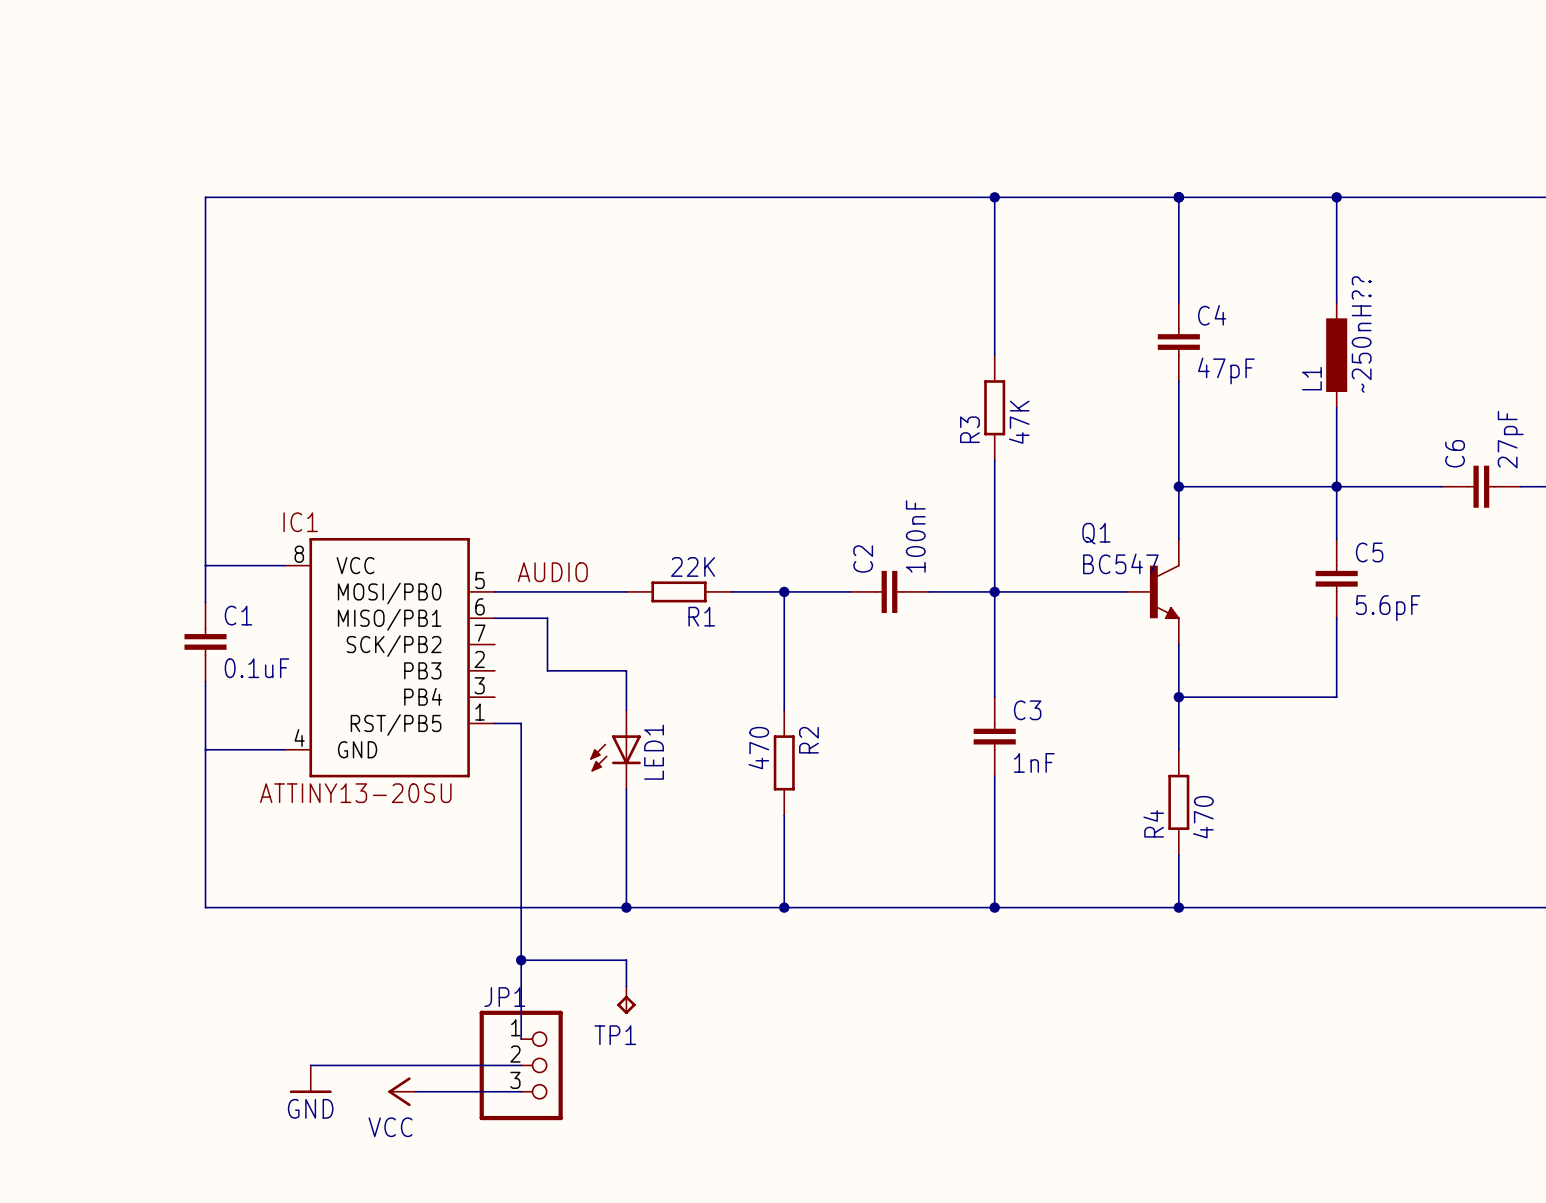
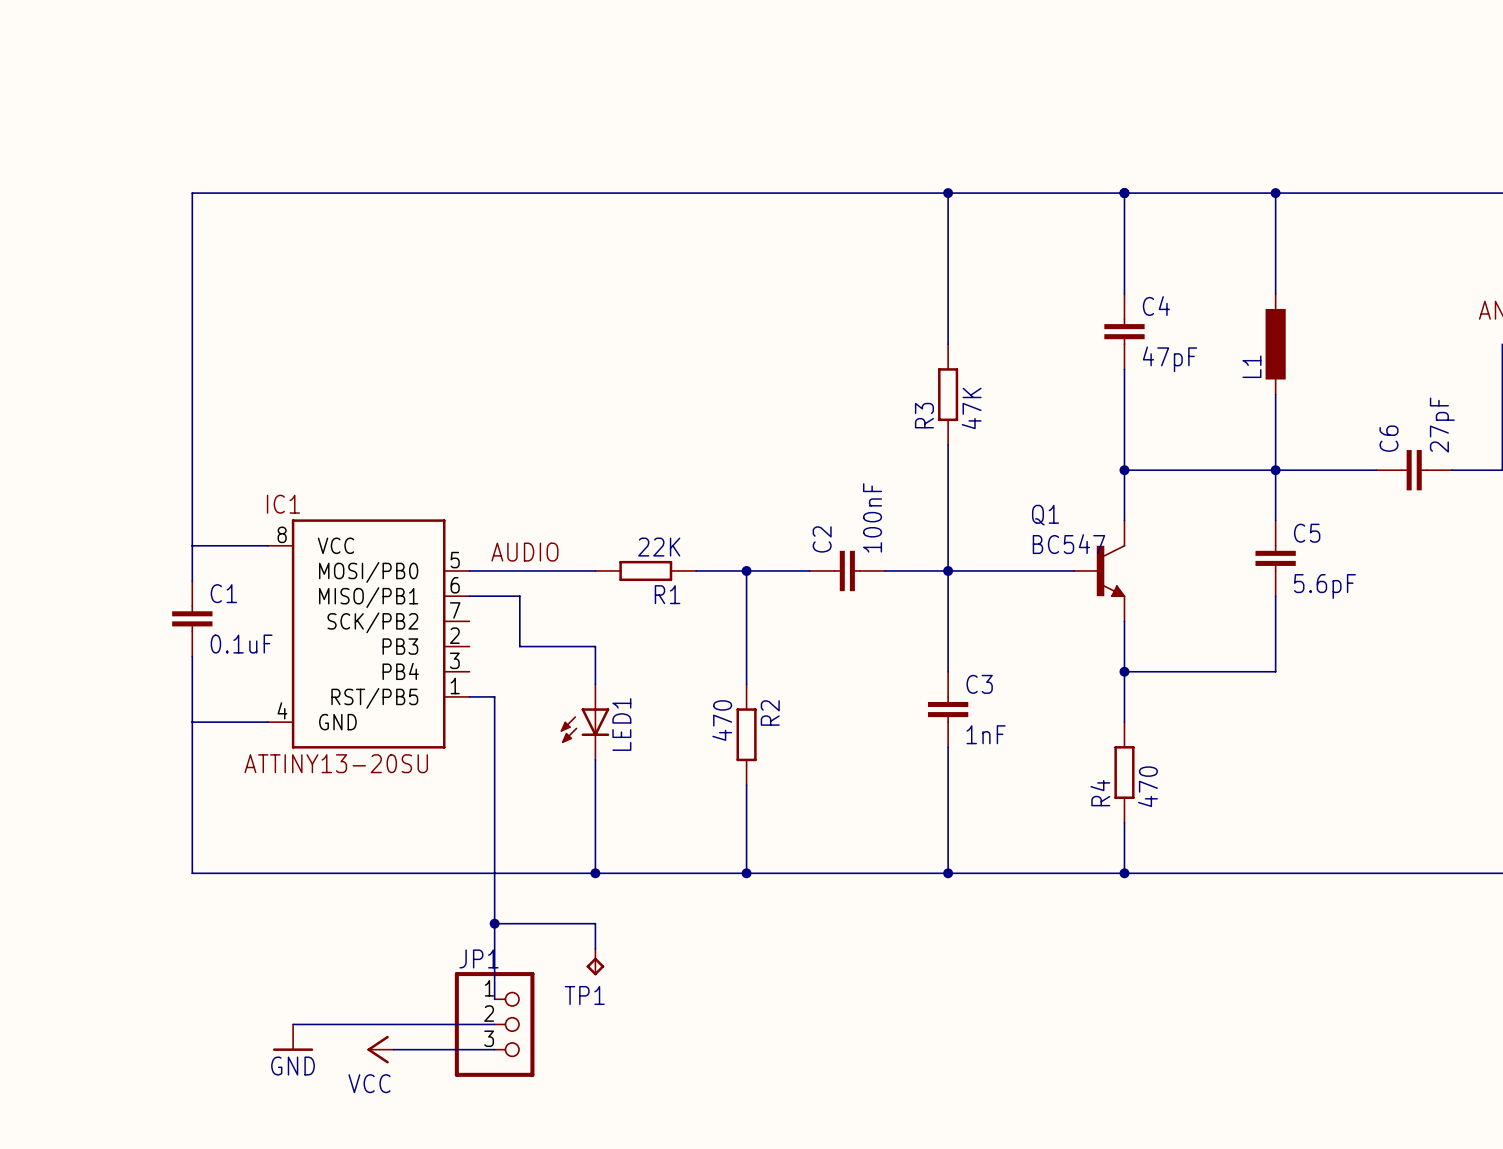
L1 value: ~250nH?? (1361, 334) -> none

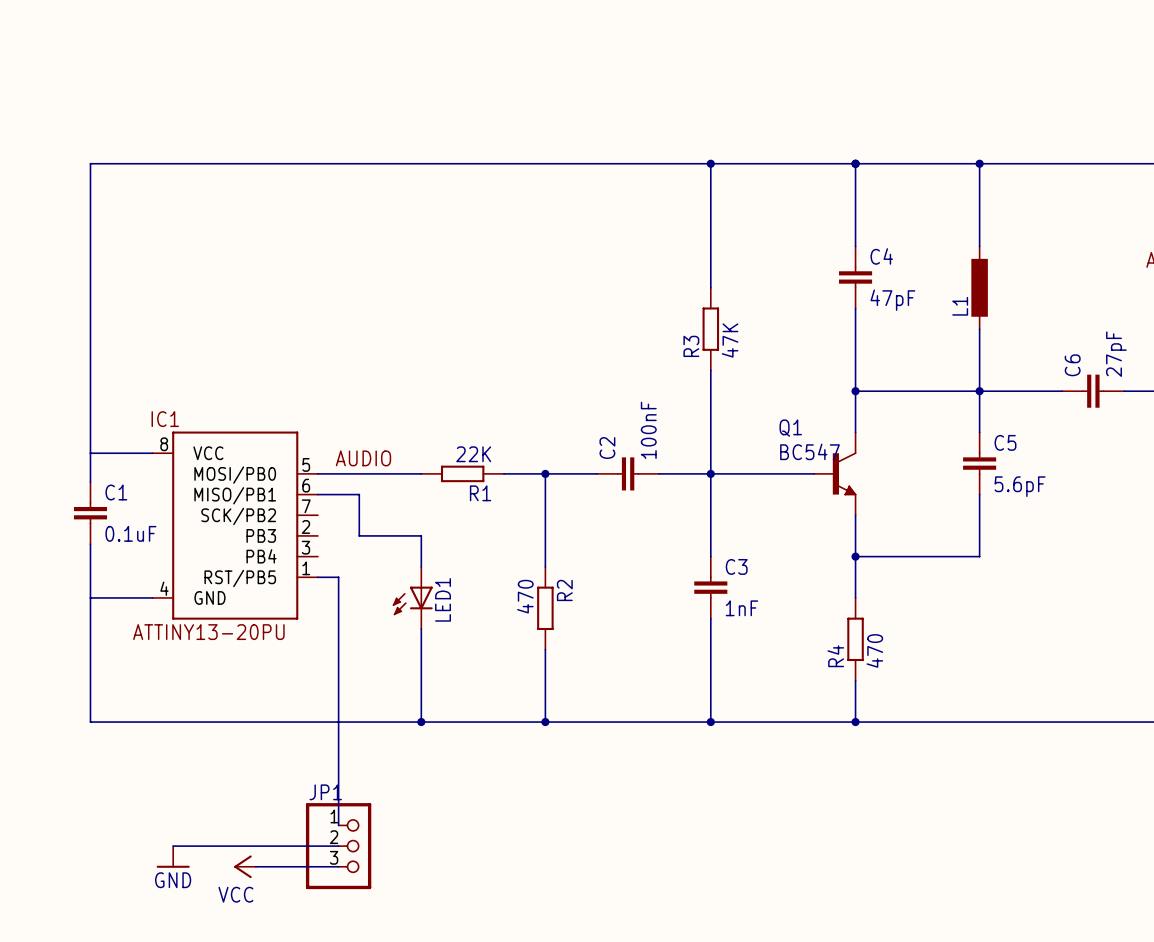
IC1 value: ATTINY13-20SU (336, 763) -> ATTINY13-20PU (208, 632)
wire: (494, 923) (595, 923) (595, 948) -> none
junction: (494, 923) -> none
TP1: (595, 962) -> none

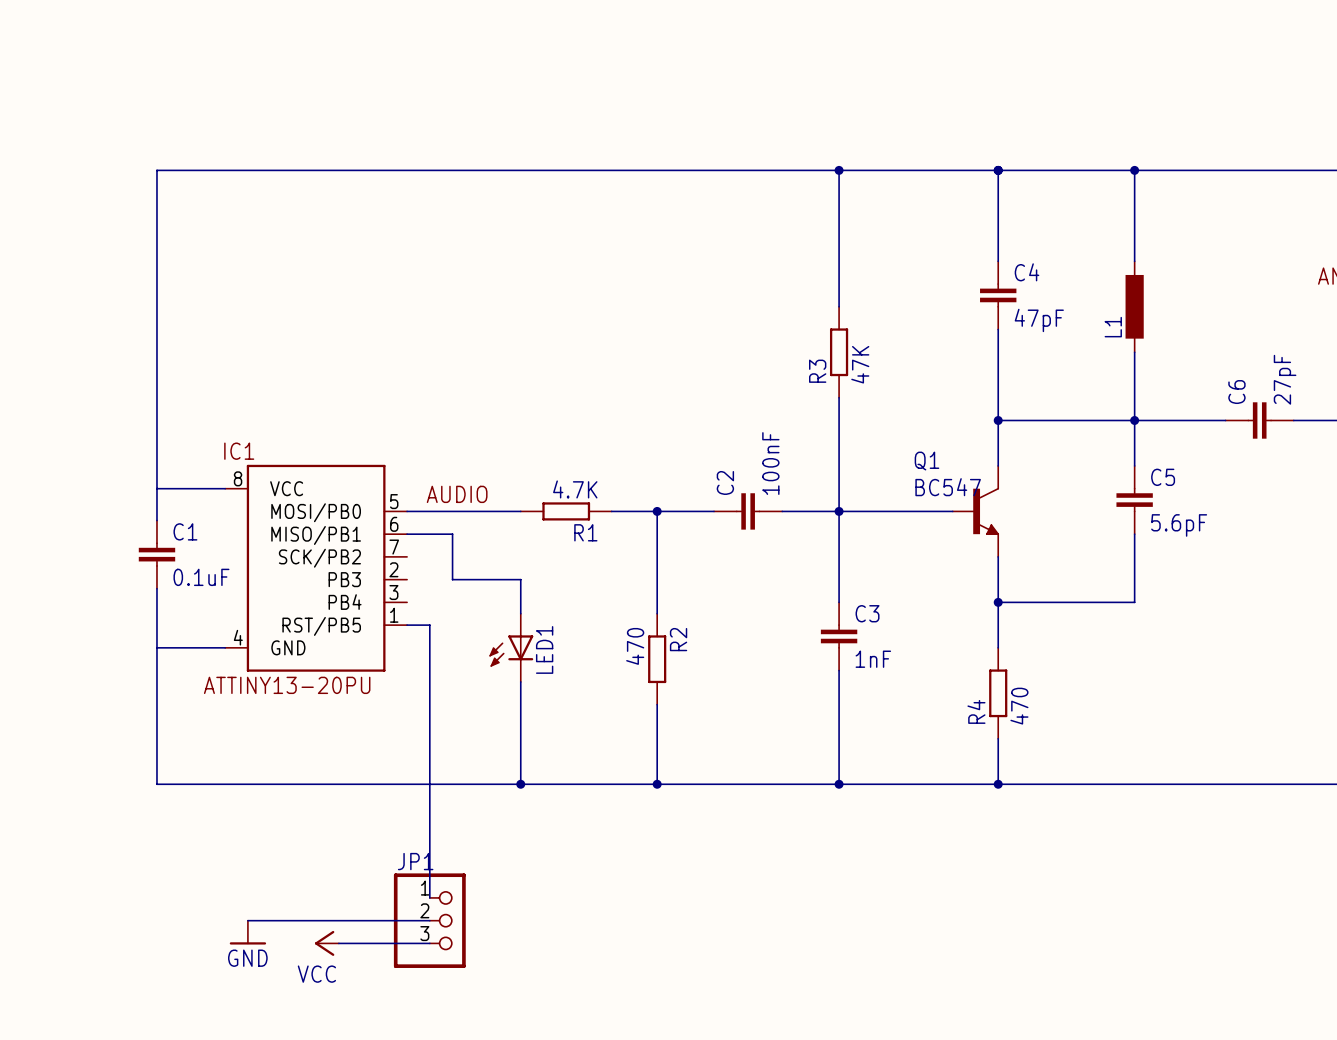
R1 value: 22K (473, 454) -> 4.7K (575, 489)

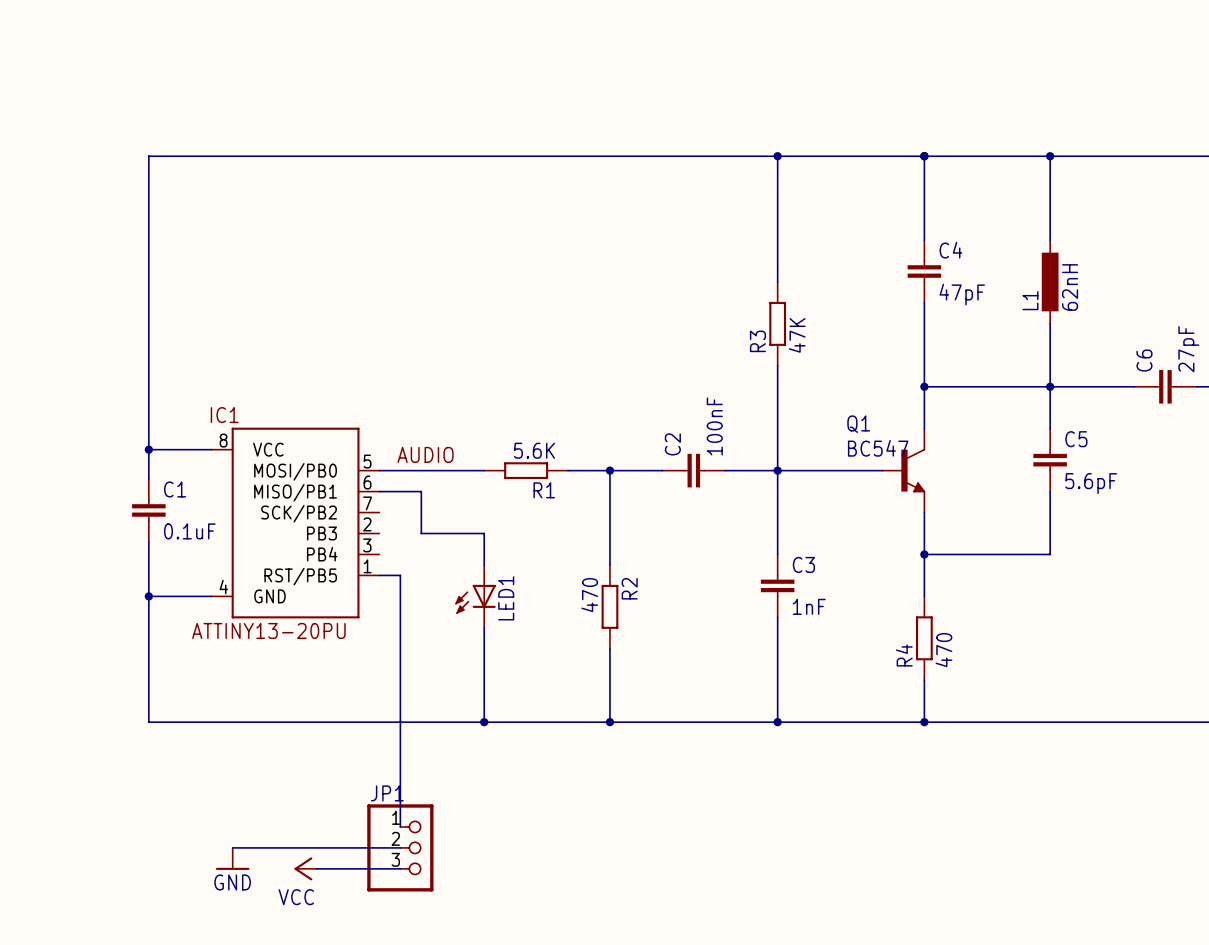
L1 value: none -> 62nH (1070, 287)
junction: none -> (148, 449)
R1 value: 4.7K (575, 489) -> 5.6K (534, 450)
junction: none -> (148, 596)

